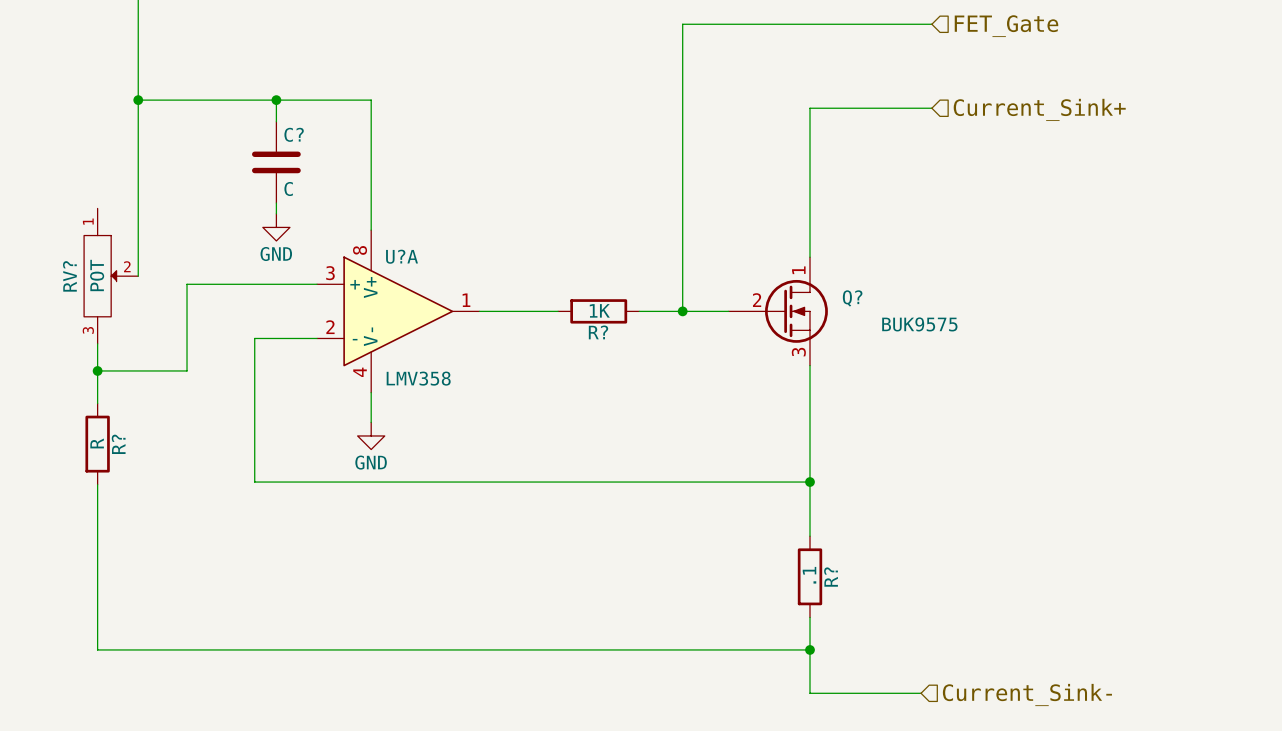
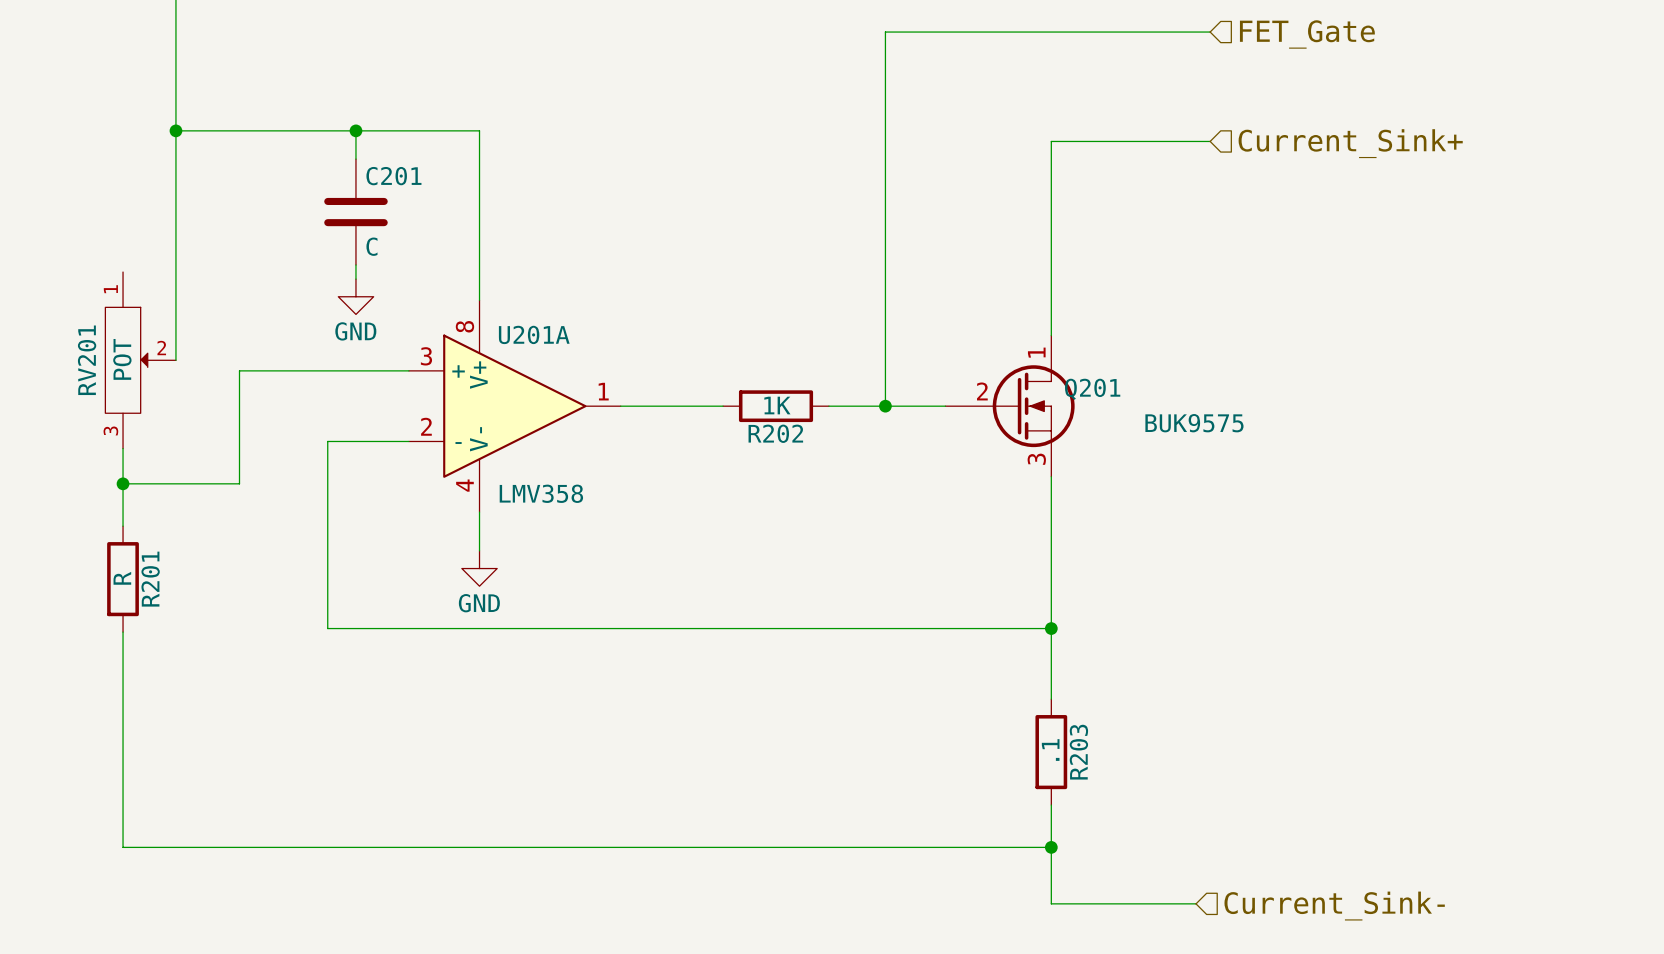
C? name: C? (294, 134) -> C201 (393, 176)
U?A name: U?A (402, 256) -> U201A (534, 334)
RV? name: RV? (69, 276) -> RV201 (87, 360)
Q? name: Q? (852, 298) -> Q201 (1092, 389)
R? name: R? (598, 332) -> R202 (775, 433)
R? name: R? (118, 444) -> R201 (150, 579)
R? name: R? (831, 577) -> R203 (1078, 752)

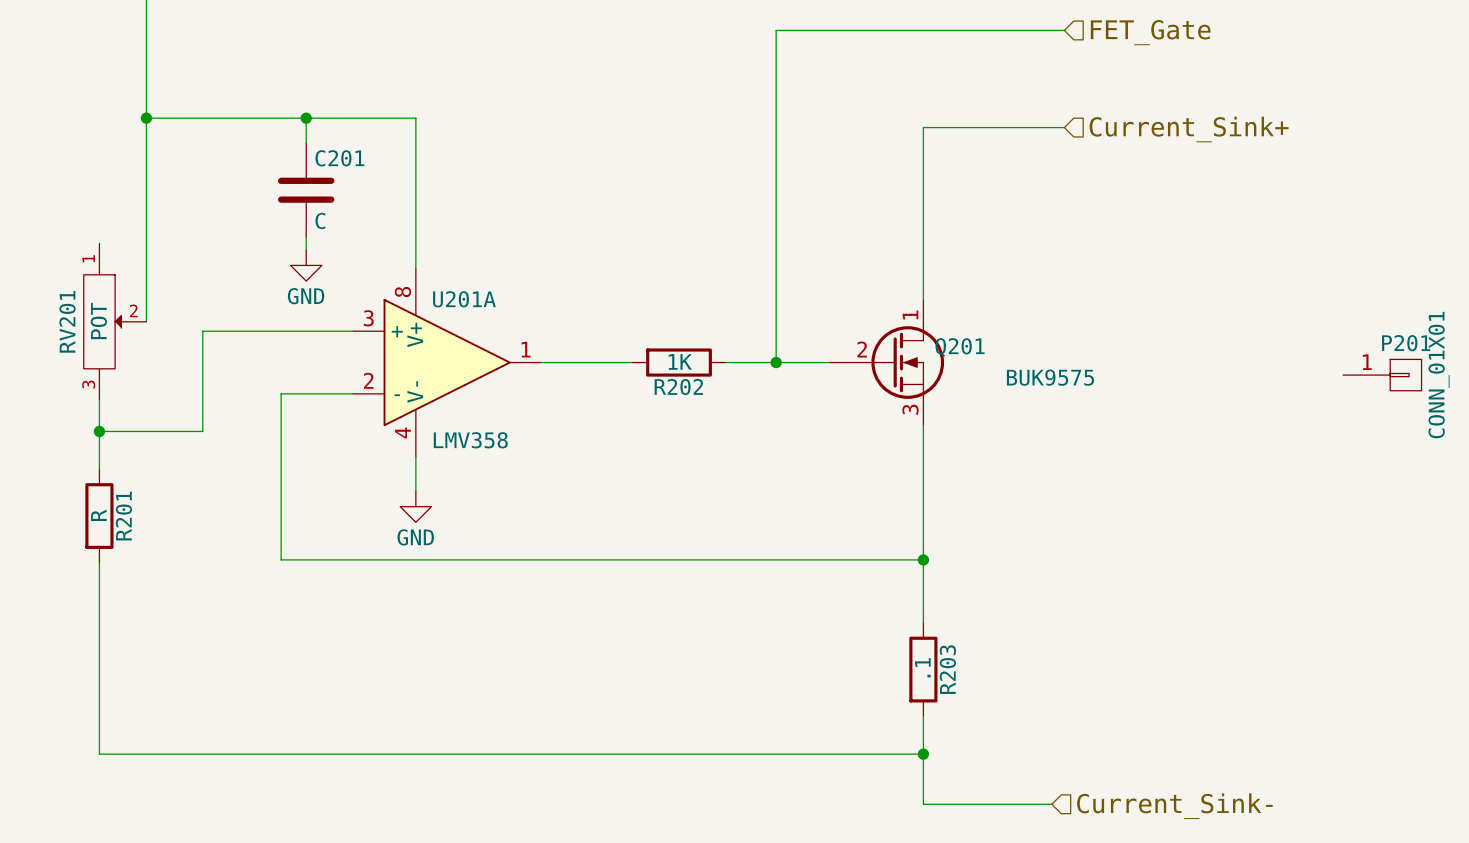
P201: none -> CONN_01X01 (1382, 375)

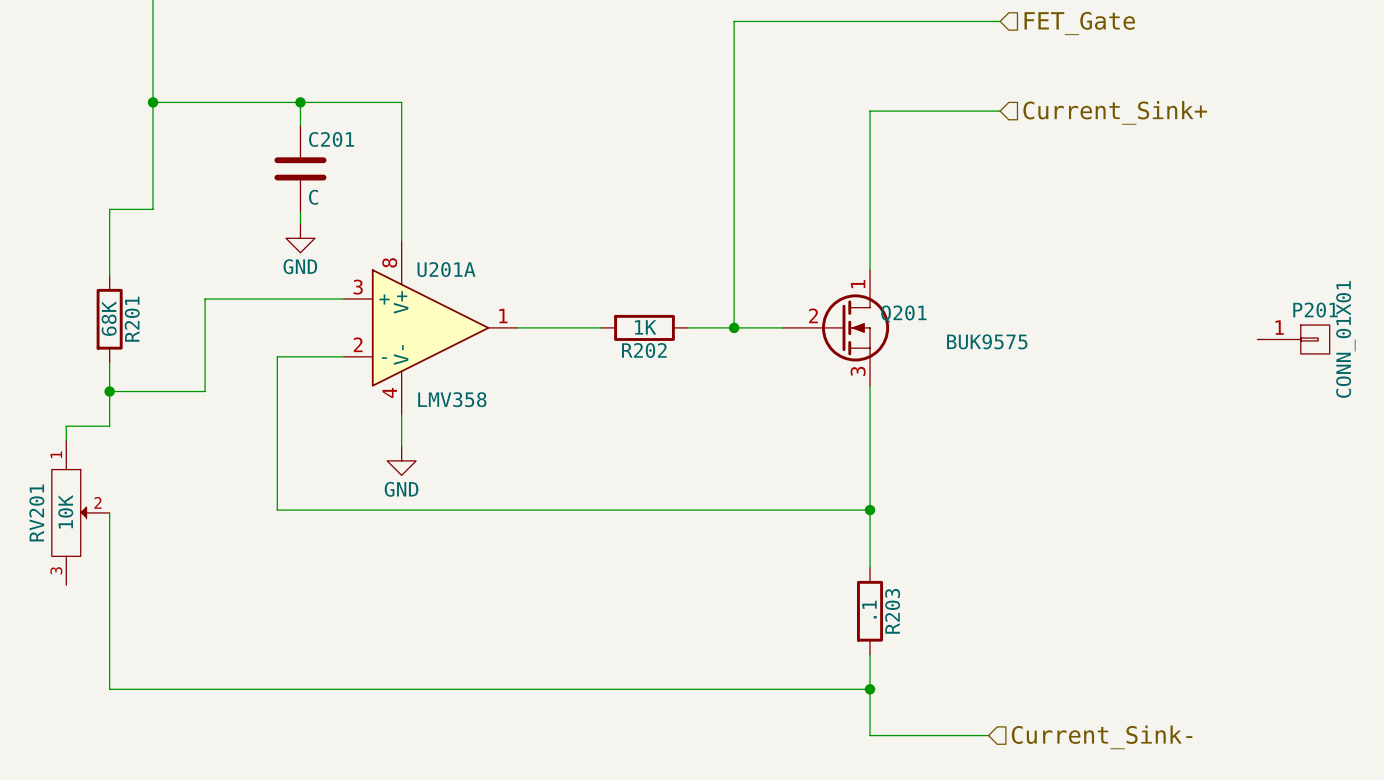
wire: (146, 234) (146, 321) -> (153, 209) (109, 209) (109, 275)
RV201 value: POT (98, 321) -> 10K (65, 511)
RV201 position: (115, 321) -> (80, 512)
wire: none -> (109, 426) (66, 426) (66, 440)
R201 value: R (98, 515) -> 68K (109, 318)
R201 position: (99, 516) -> (109, 319)

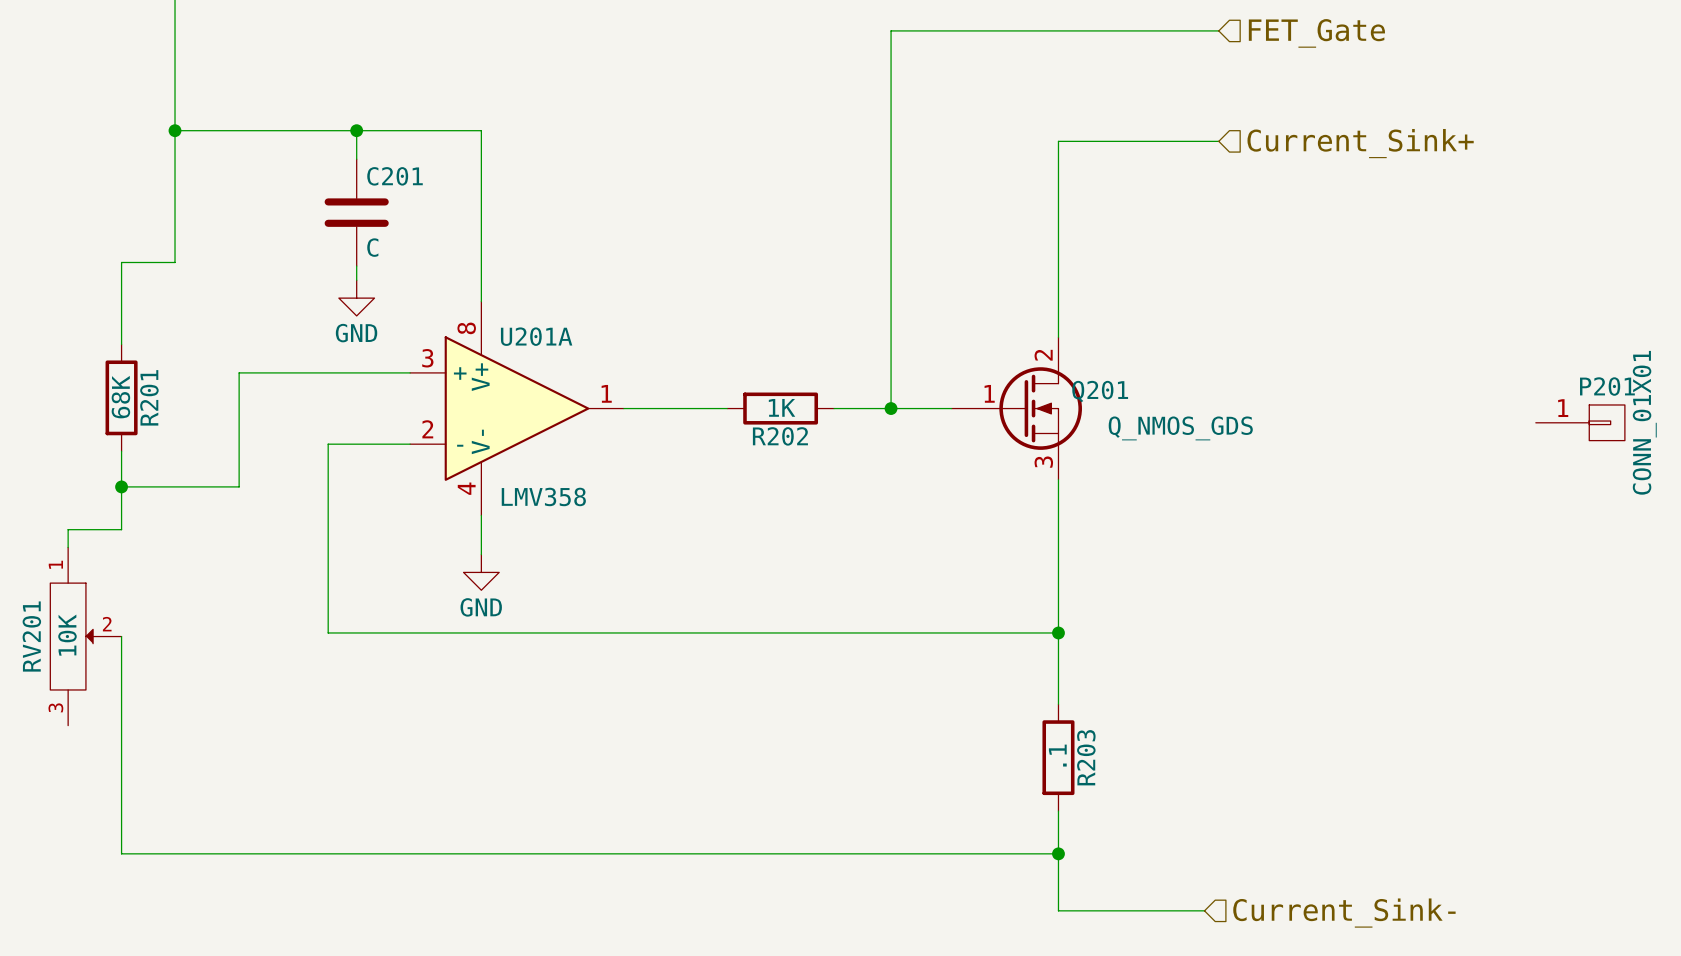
Q201 pin number: 1 (858, 284) -> 2 (1043, 355)
Q201 pin number: 2 (813, 315) -> 1 (989, 393)
Q201 value: BUK9575 (987, 341) -> Q_NMOS_GDS (1180, 428)

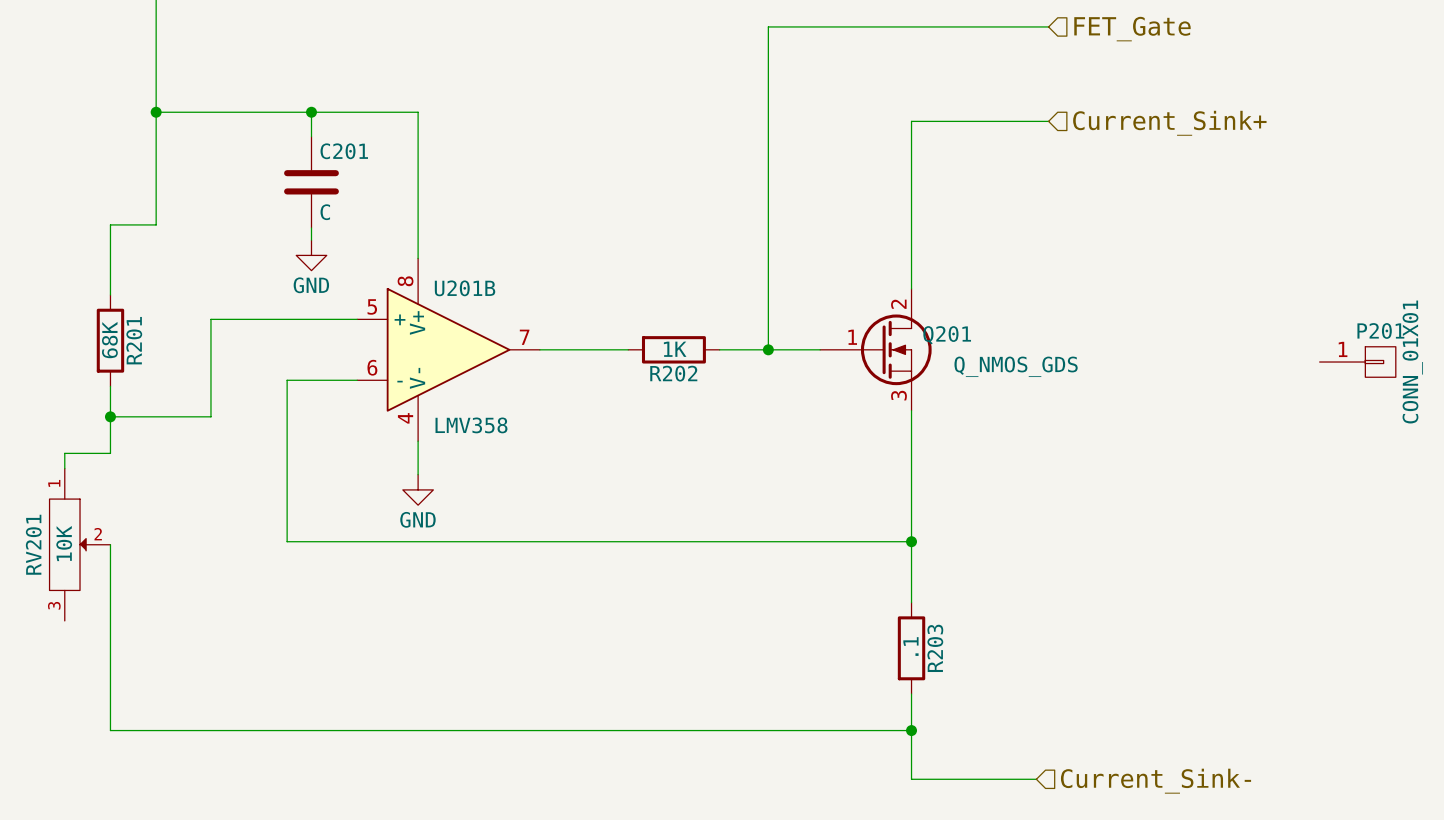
U201A name: U201A (536, 336) -> U201B (465, 288)
U201A pin number: 3 (427, 358) -> 5 (372, 306)
U201A pin number: 1 (606, 393) -> 7 (524, 337)
U201A pin number: 2 (427, 429) -> 6 (372, 367)

